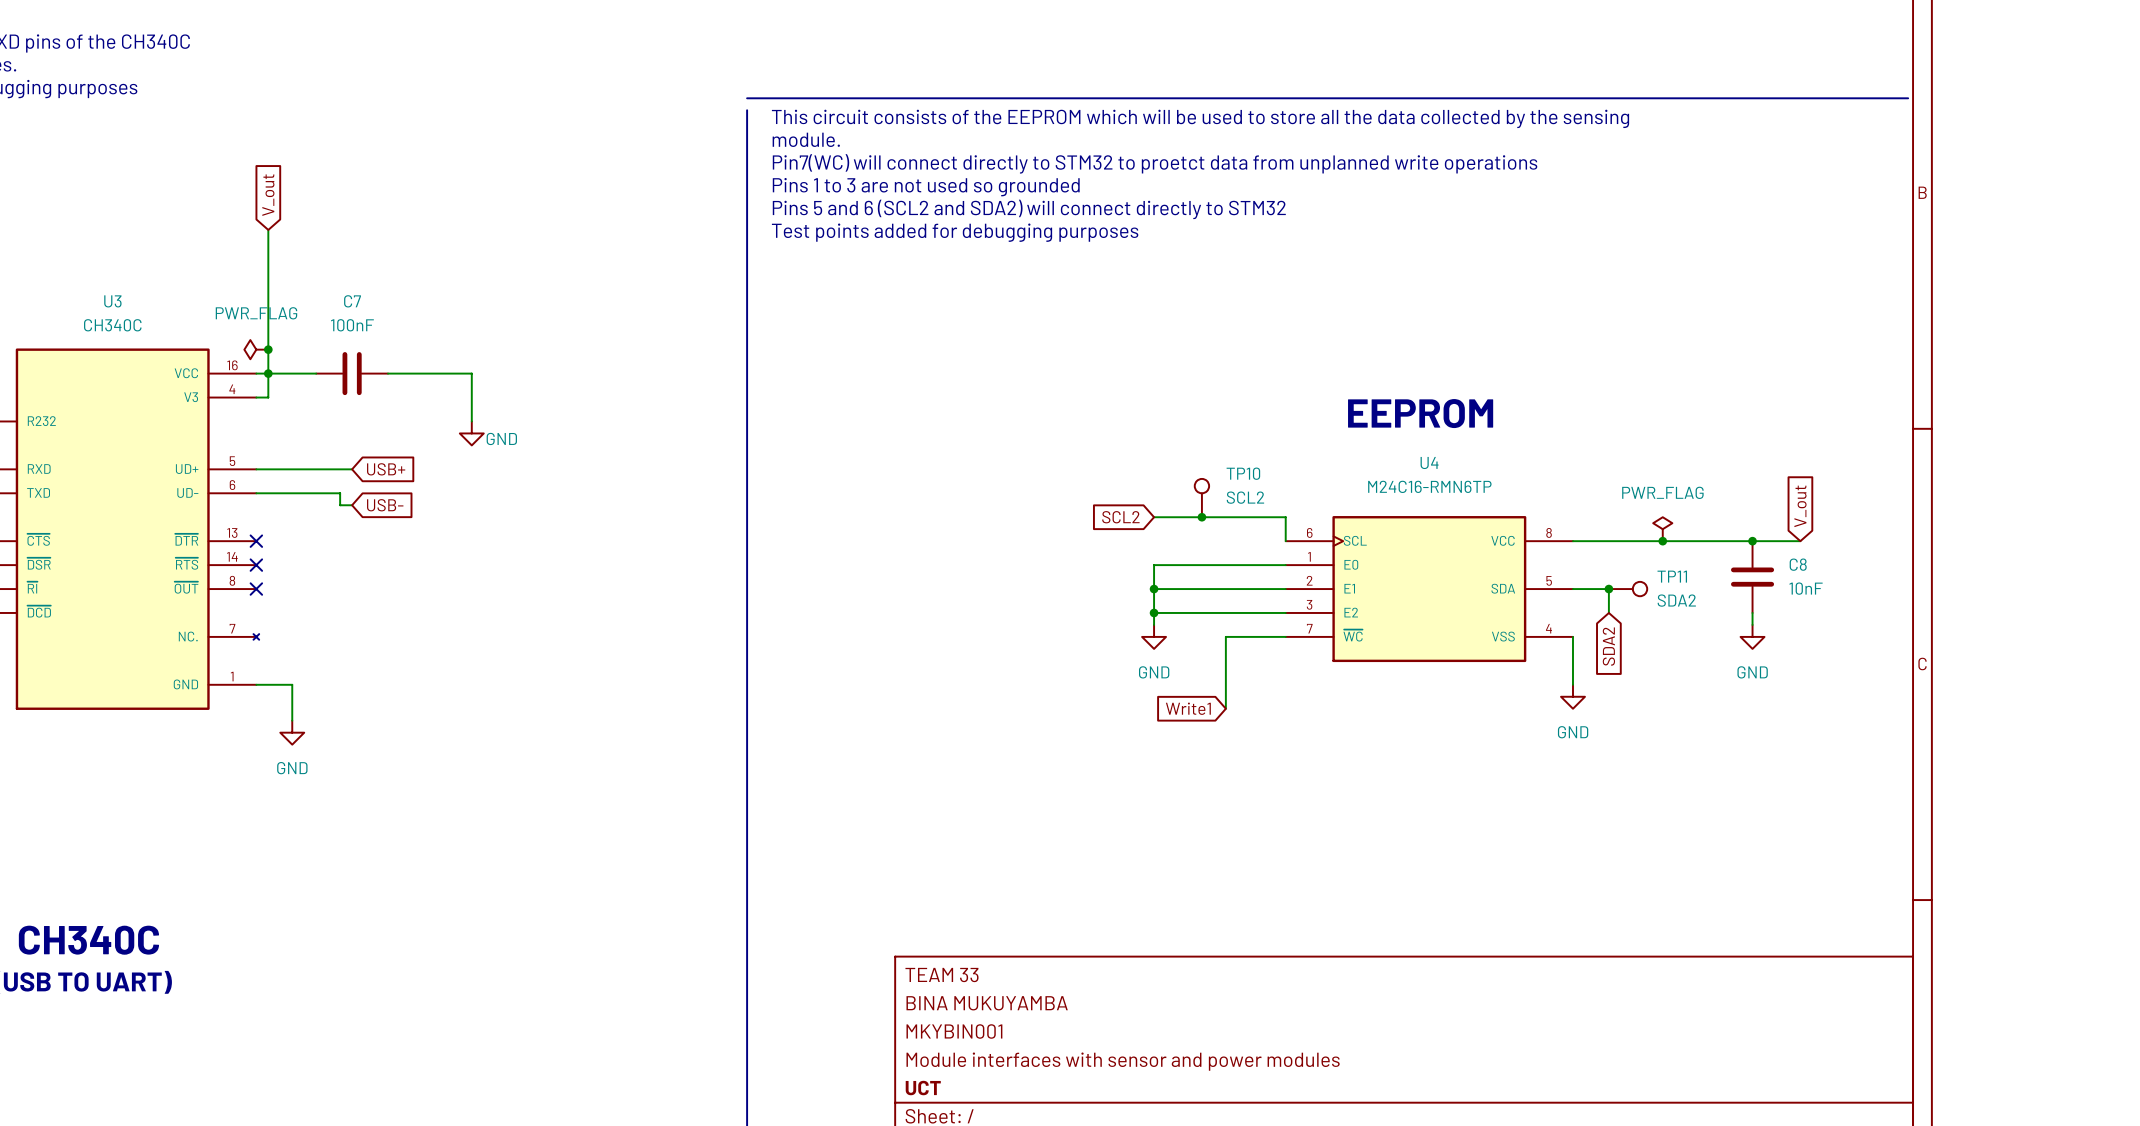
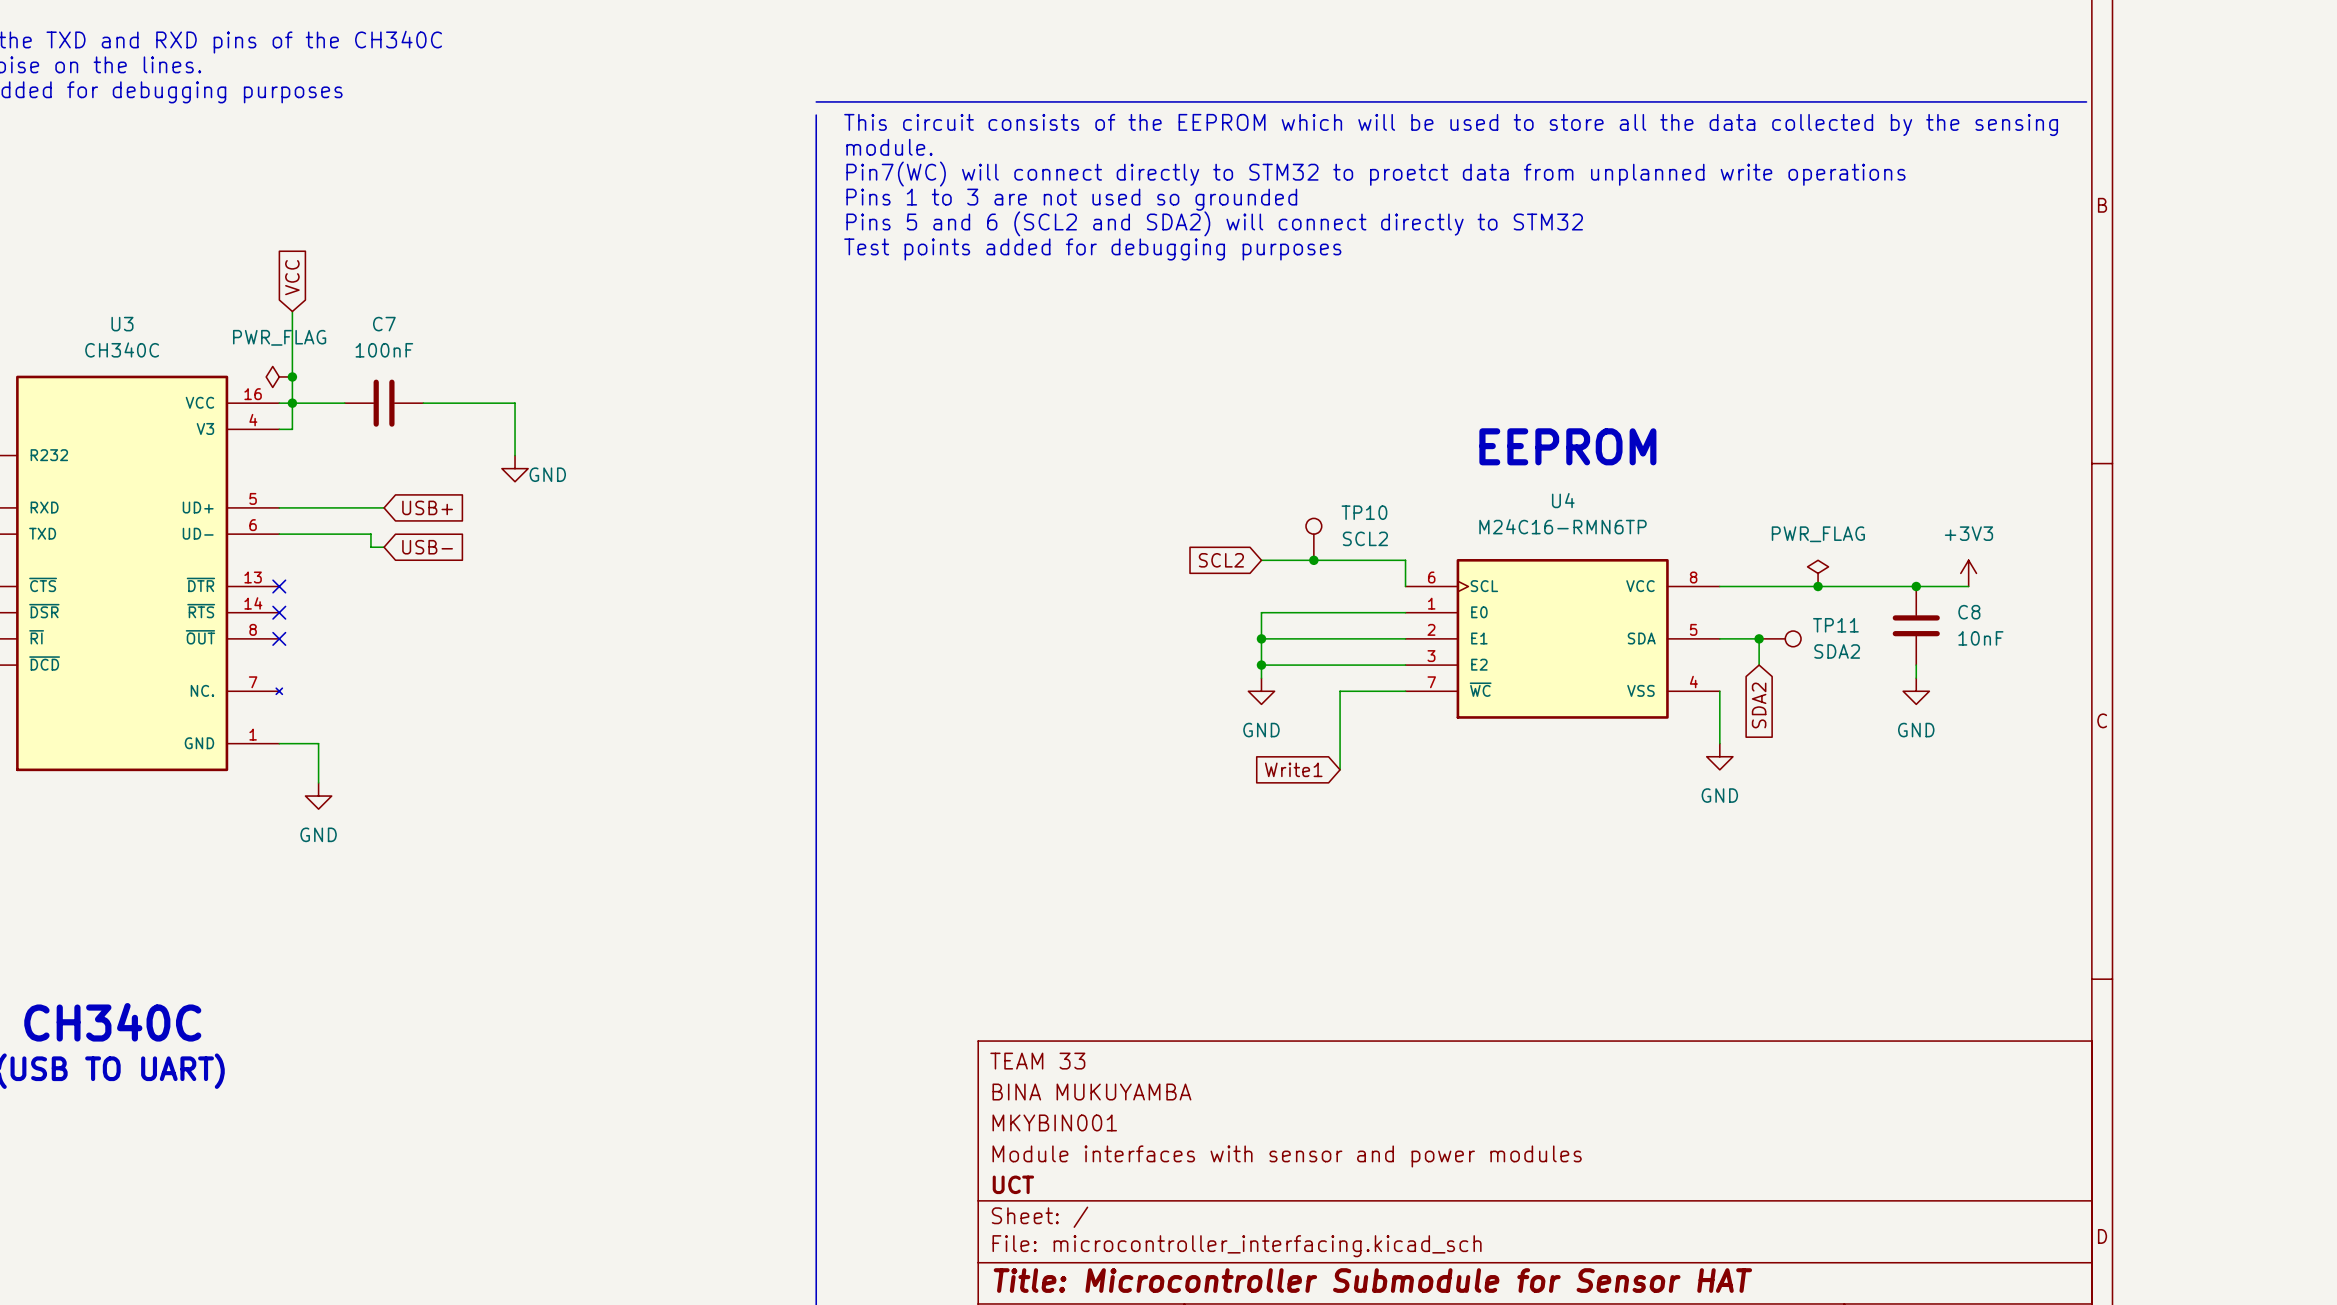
global label: V_out (268, 195) -> none
wire: (268, 229) (268, 289) -> none
global label: none -> VCC (292, 277)
global label: V_out (1800, 506) -> none
power symbol: none -> +3V3 (1968, 573)

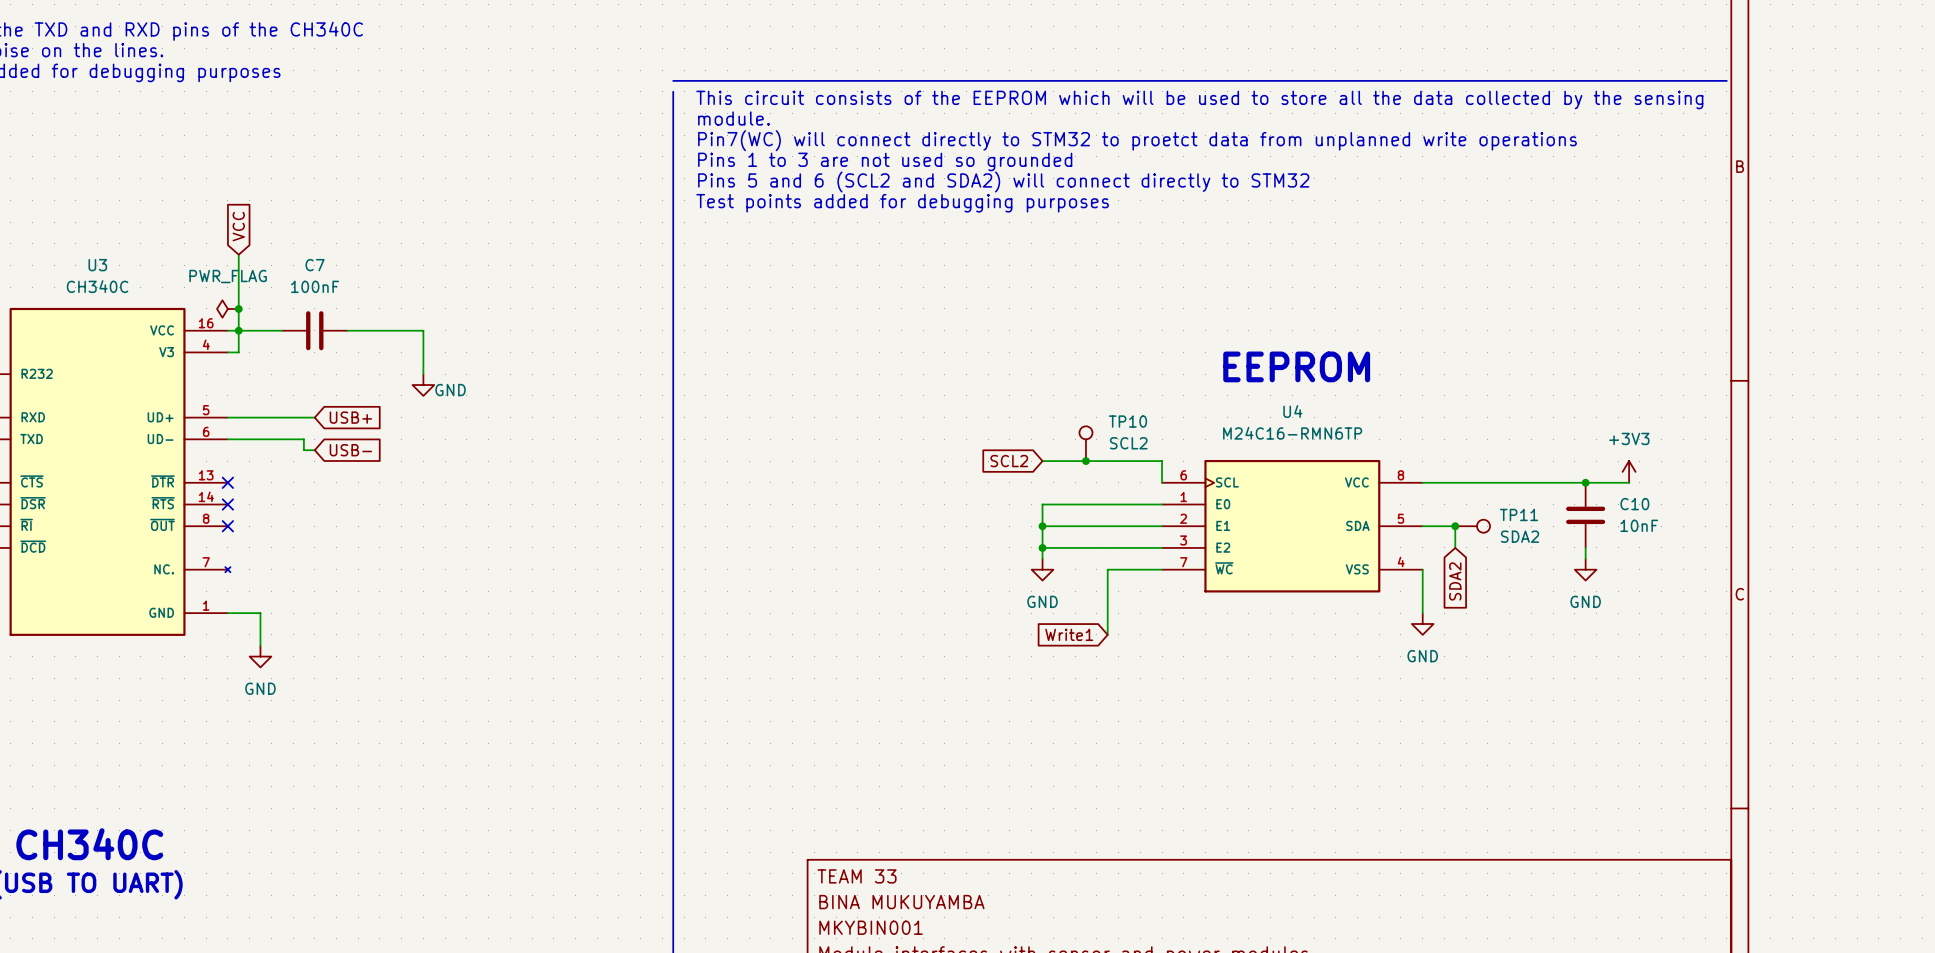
power symbol: PWR_FLAG (1818, 573) -> none
junction: (1818, 586) -> none
C8 name: C8 (1969, 612) -> C10 (1634, 504)

